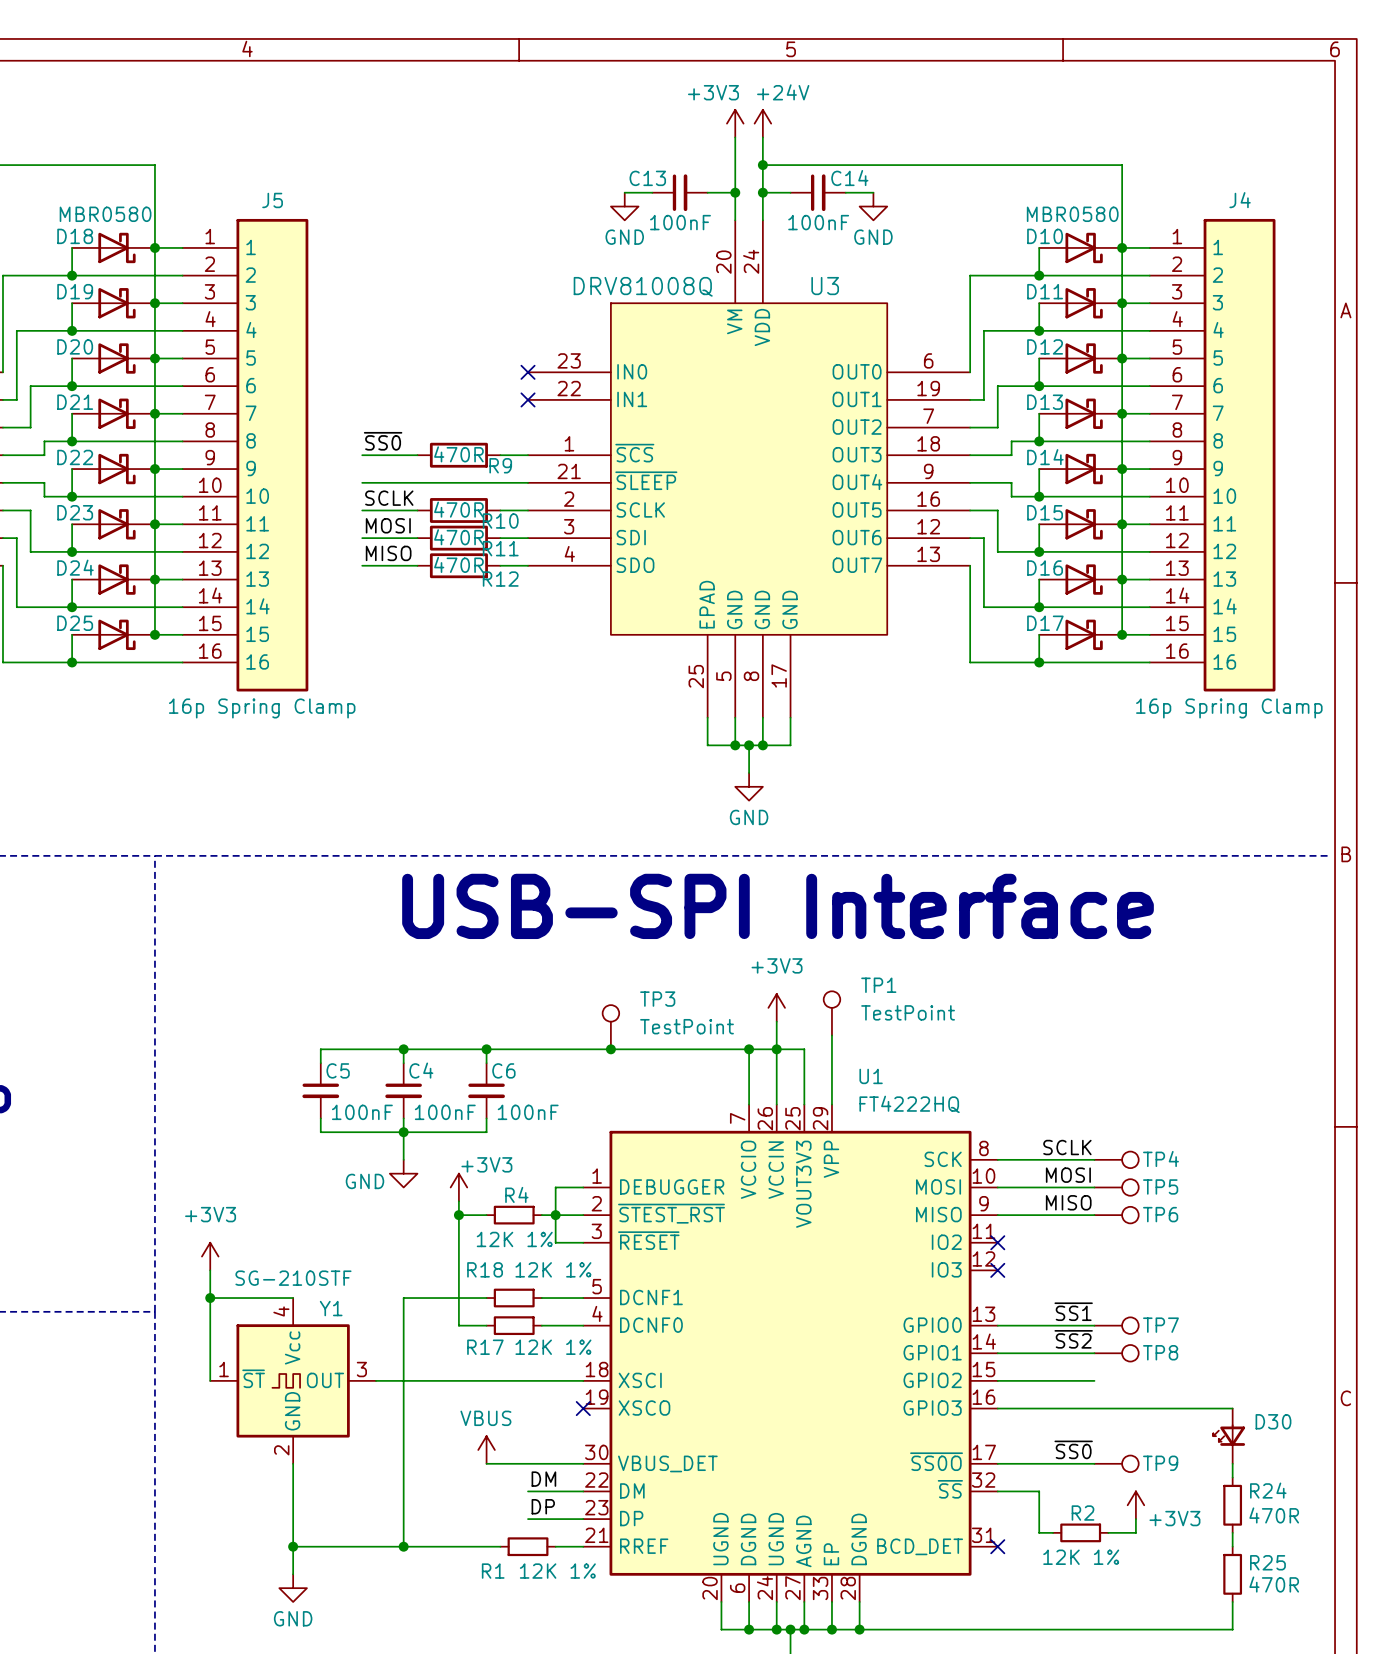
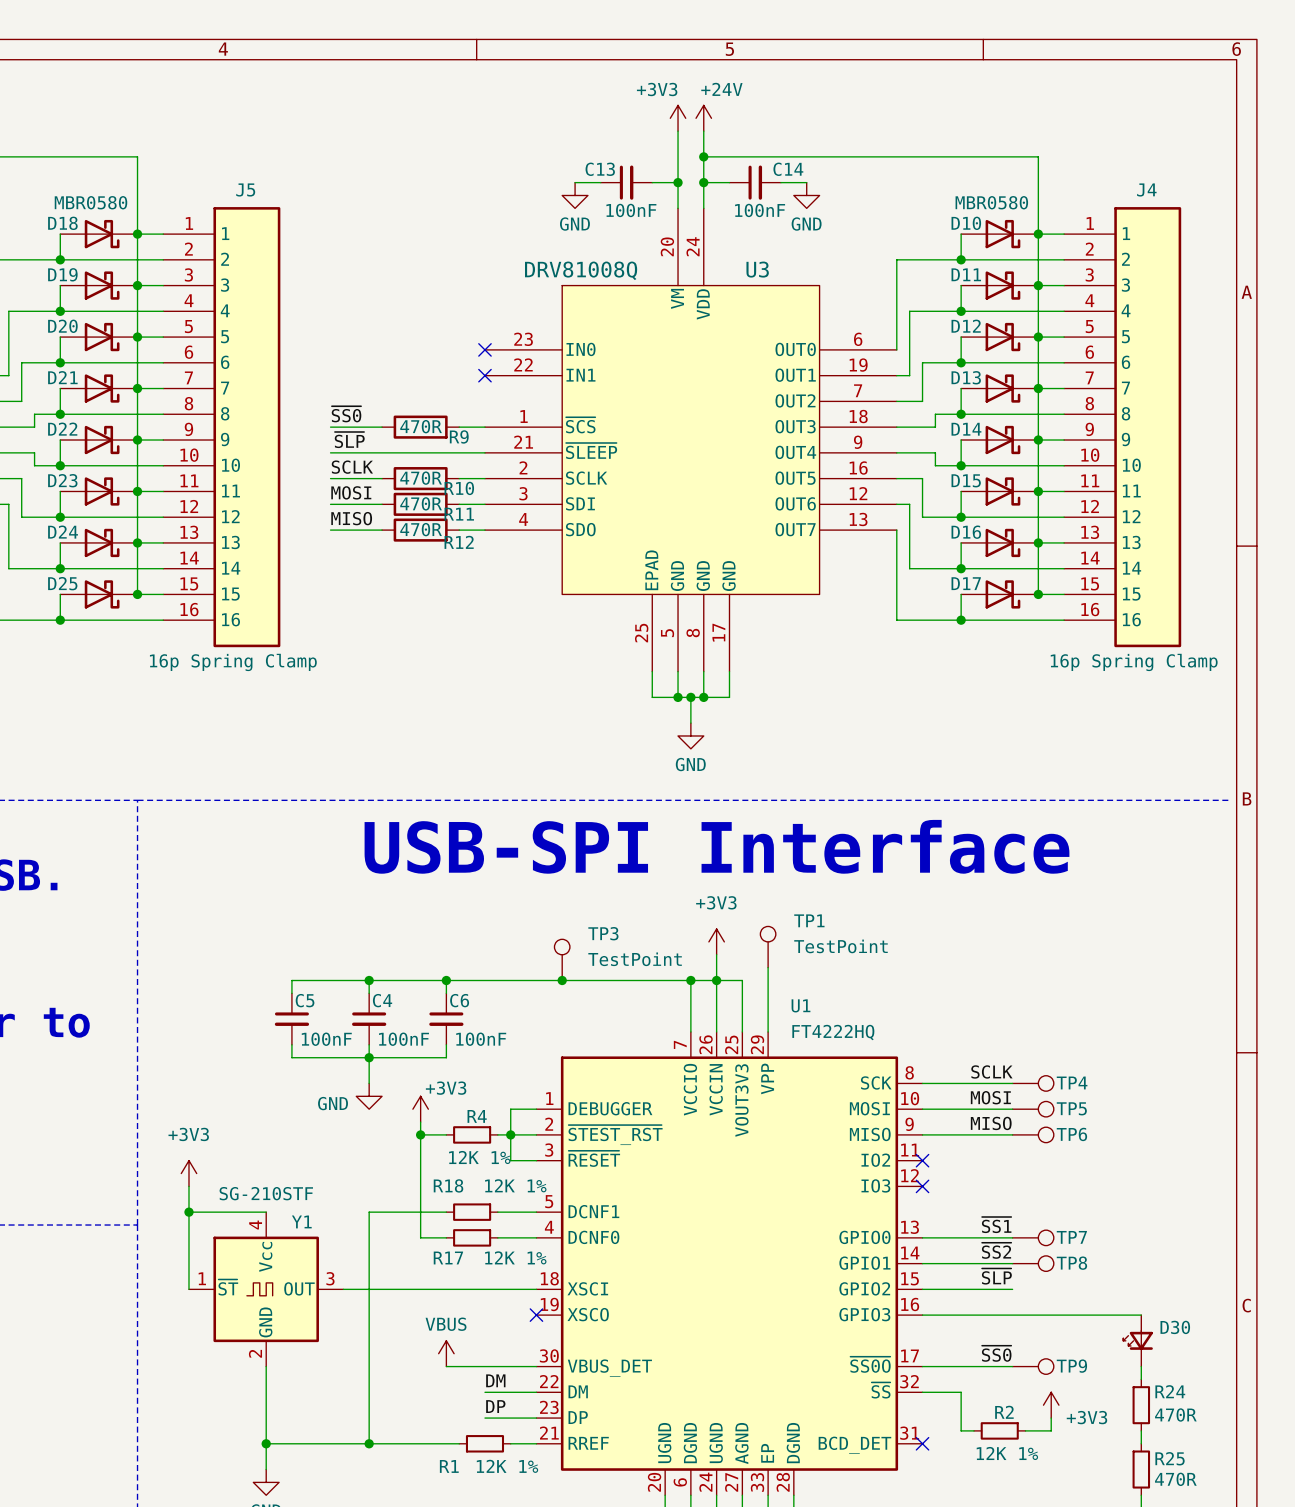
label: none -> ~{SLP} (349, 440)
label: none -> ~{SLP} (996, 1276)

